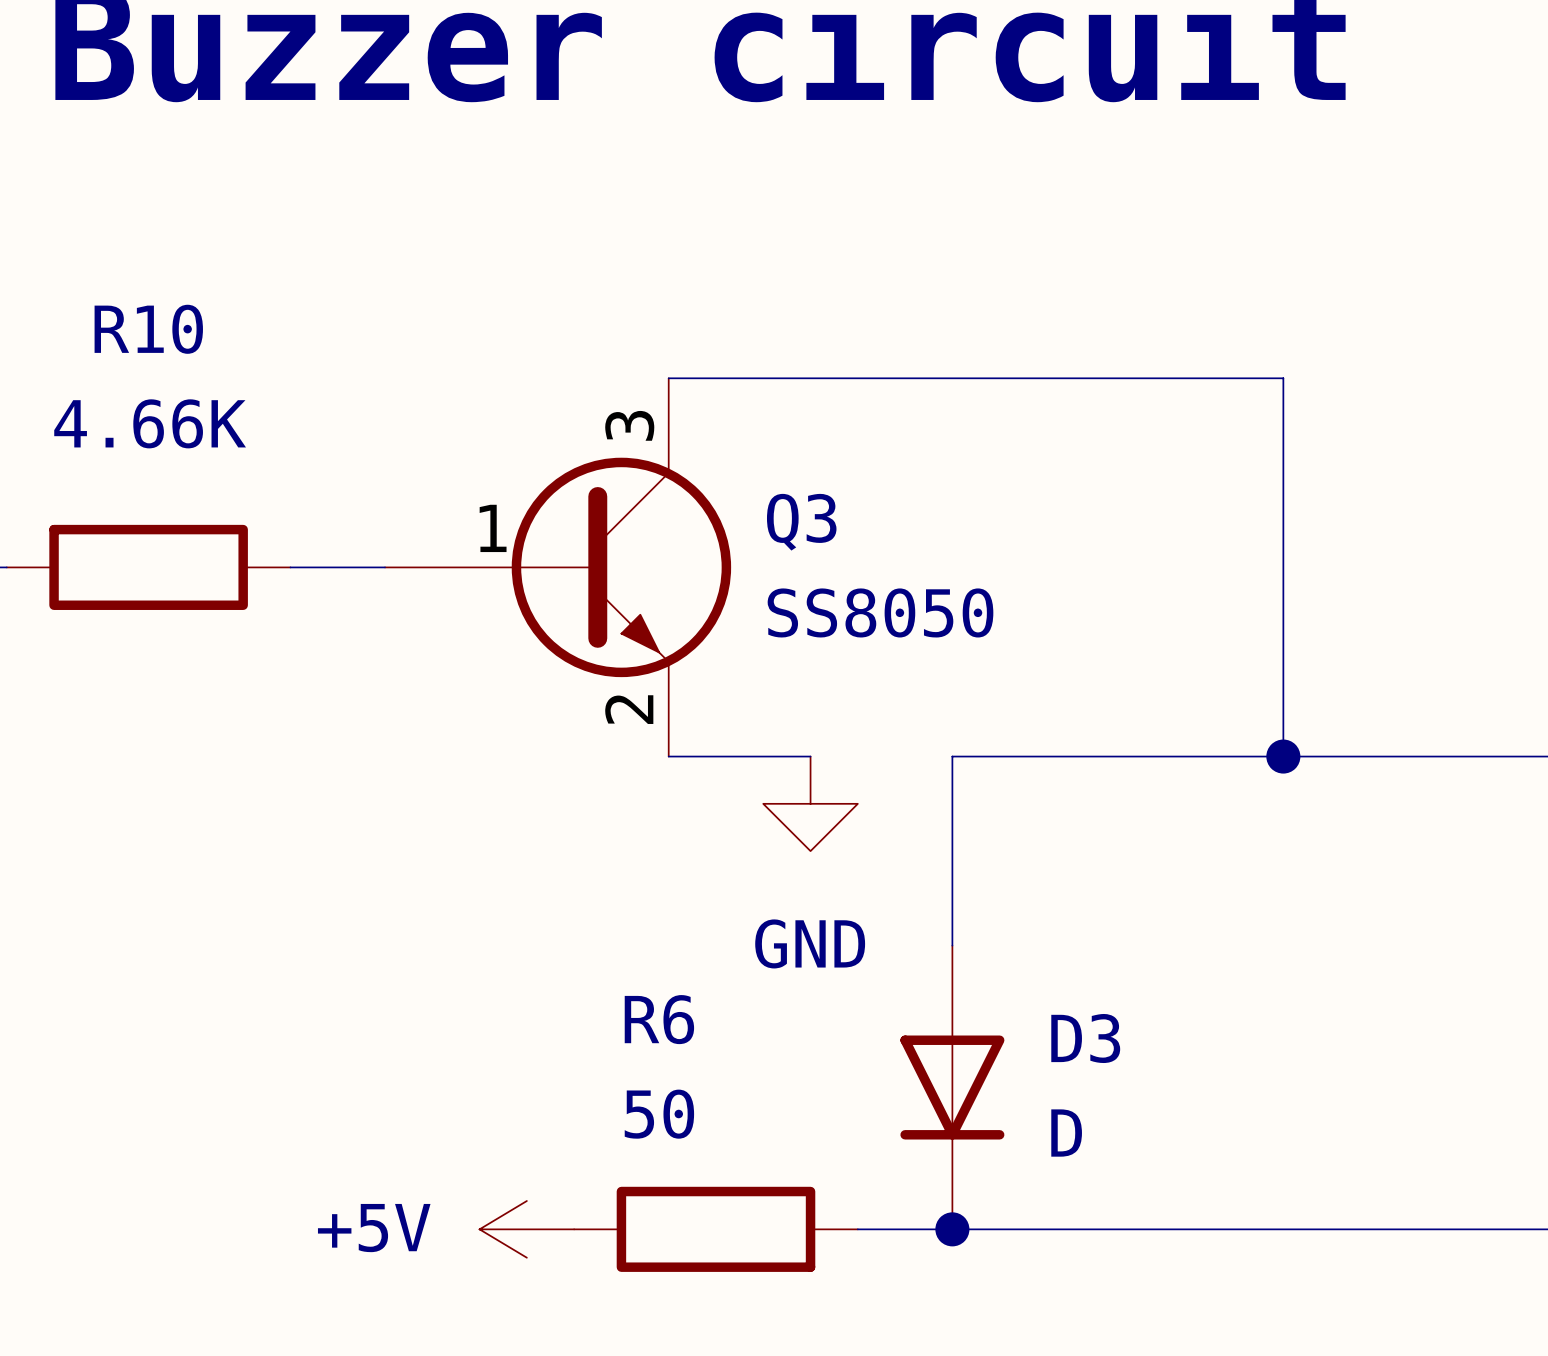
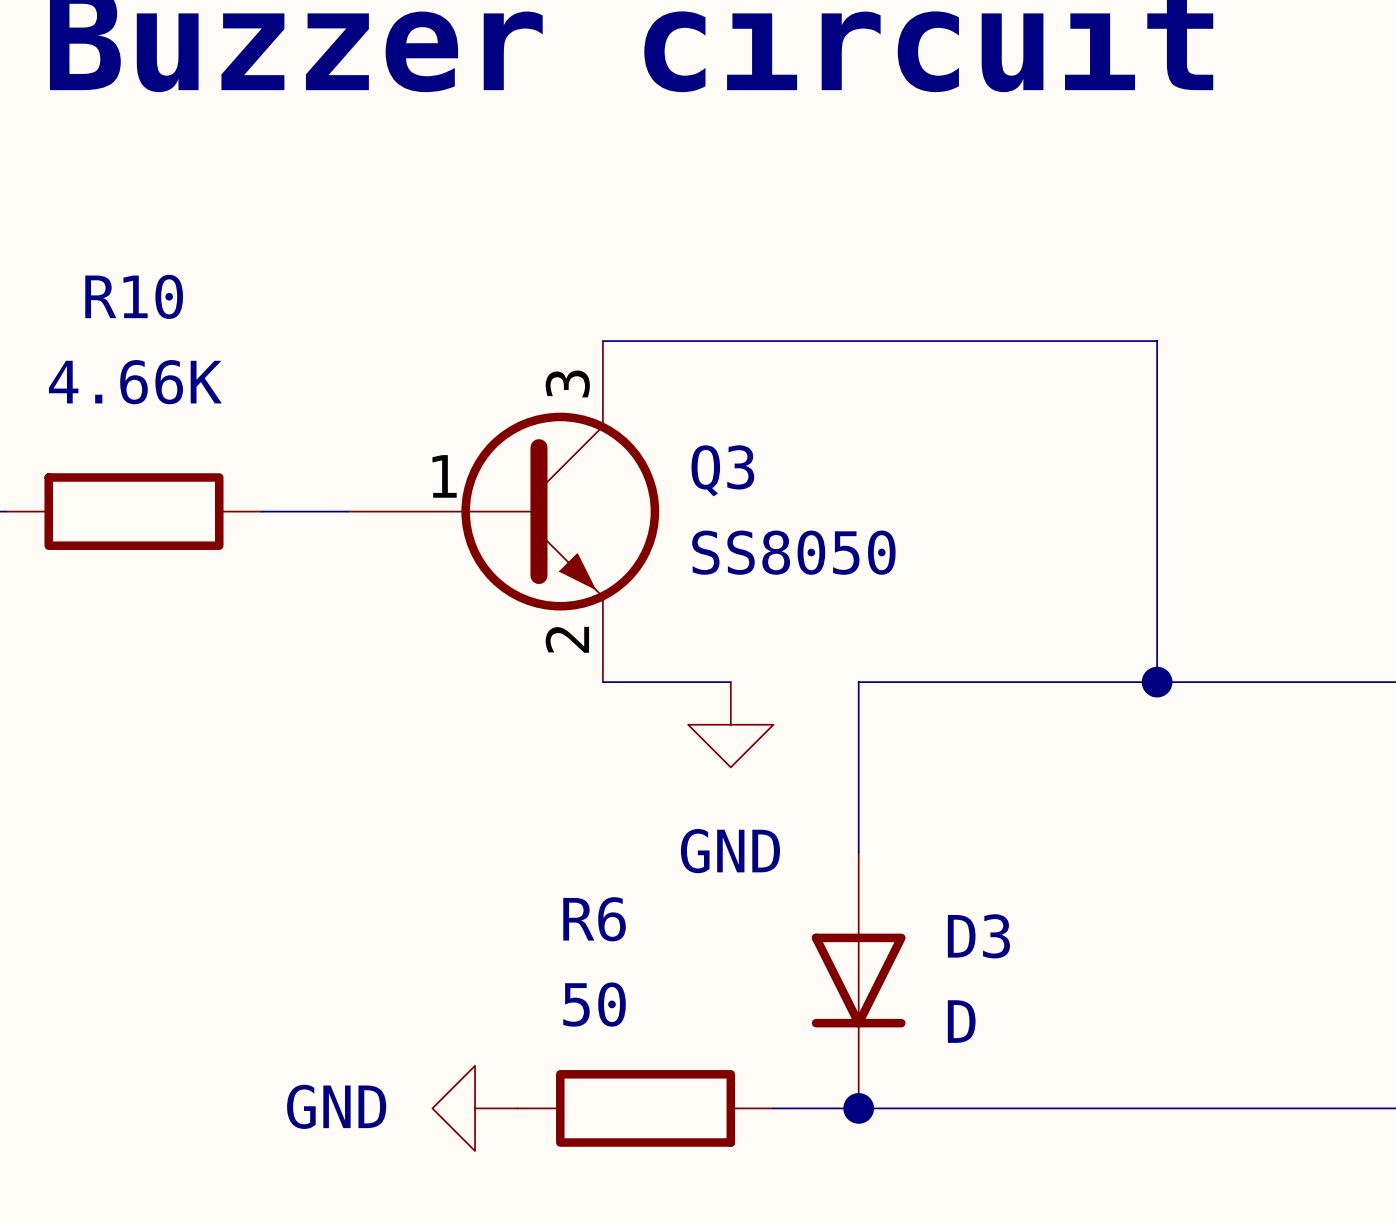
power symbol: +5V (526, 1229) -> GND (475, 1108)

